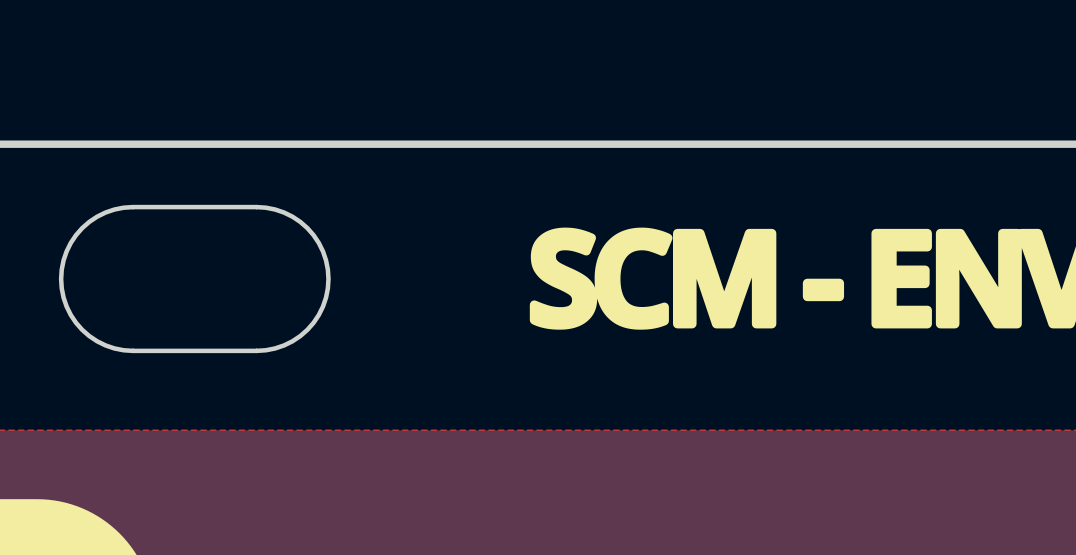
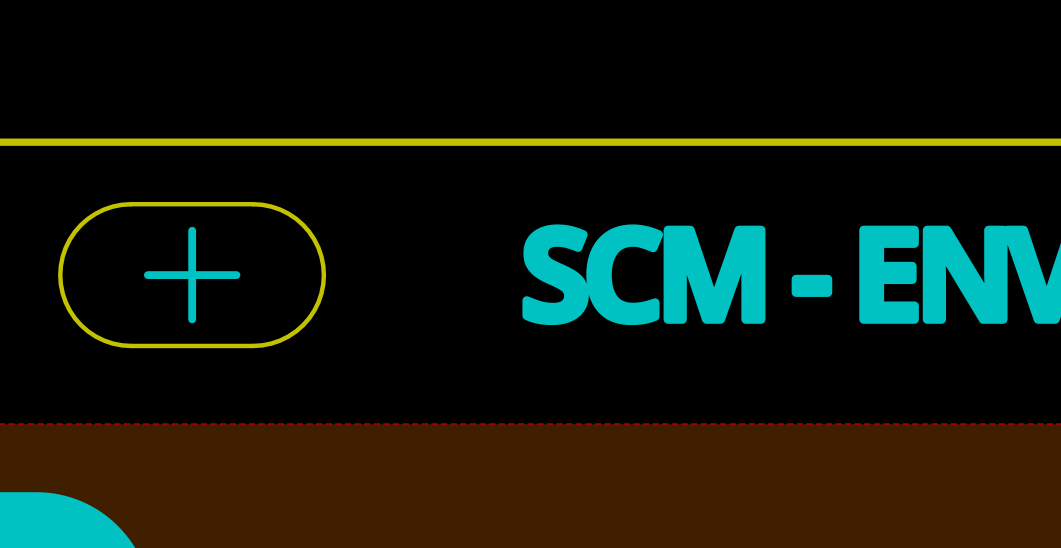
line: none -> (192, 230) (192, 319)
line: none -> (147, 275) (236, 275)

